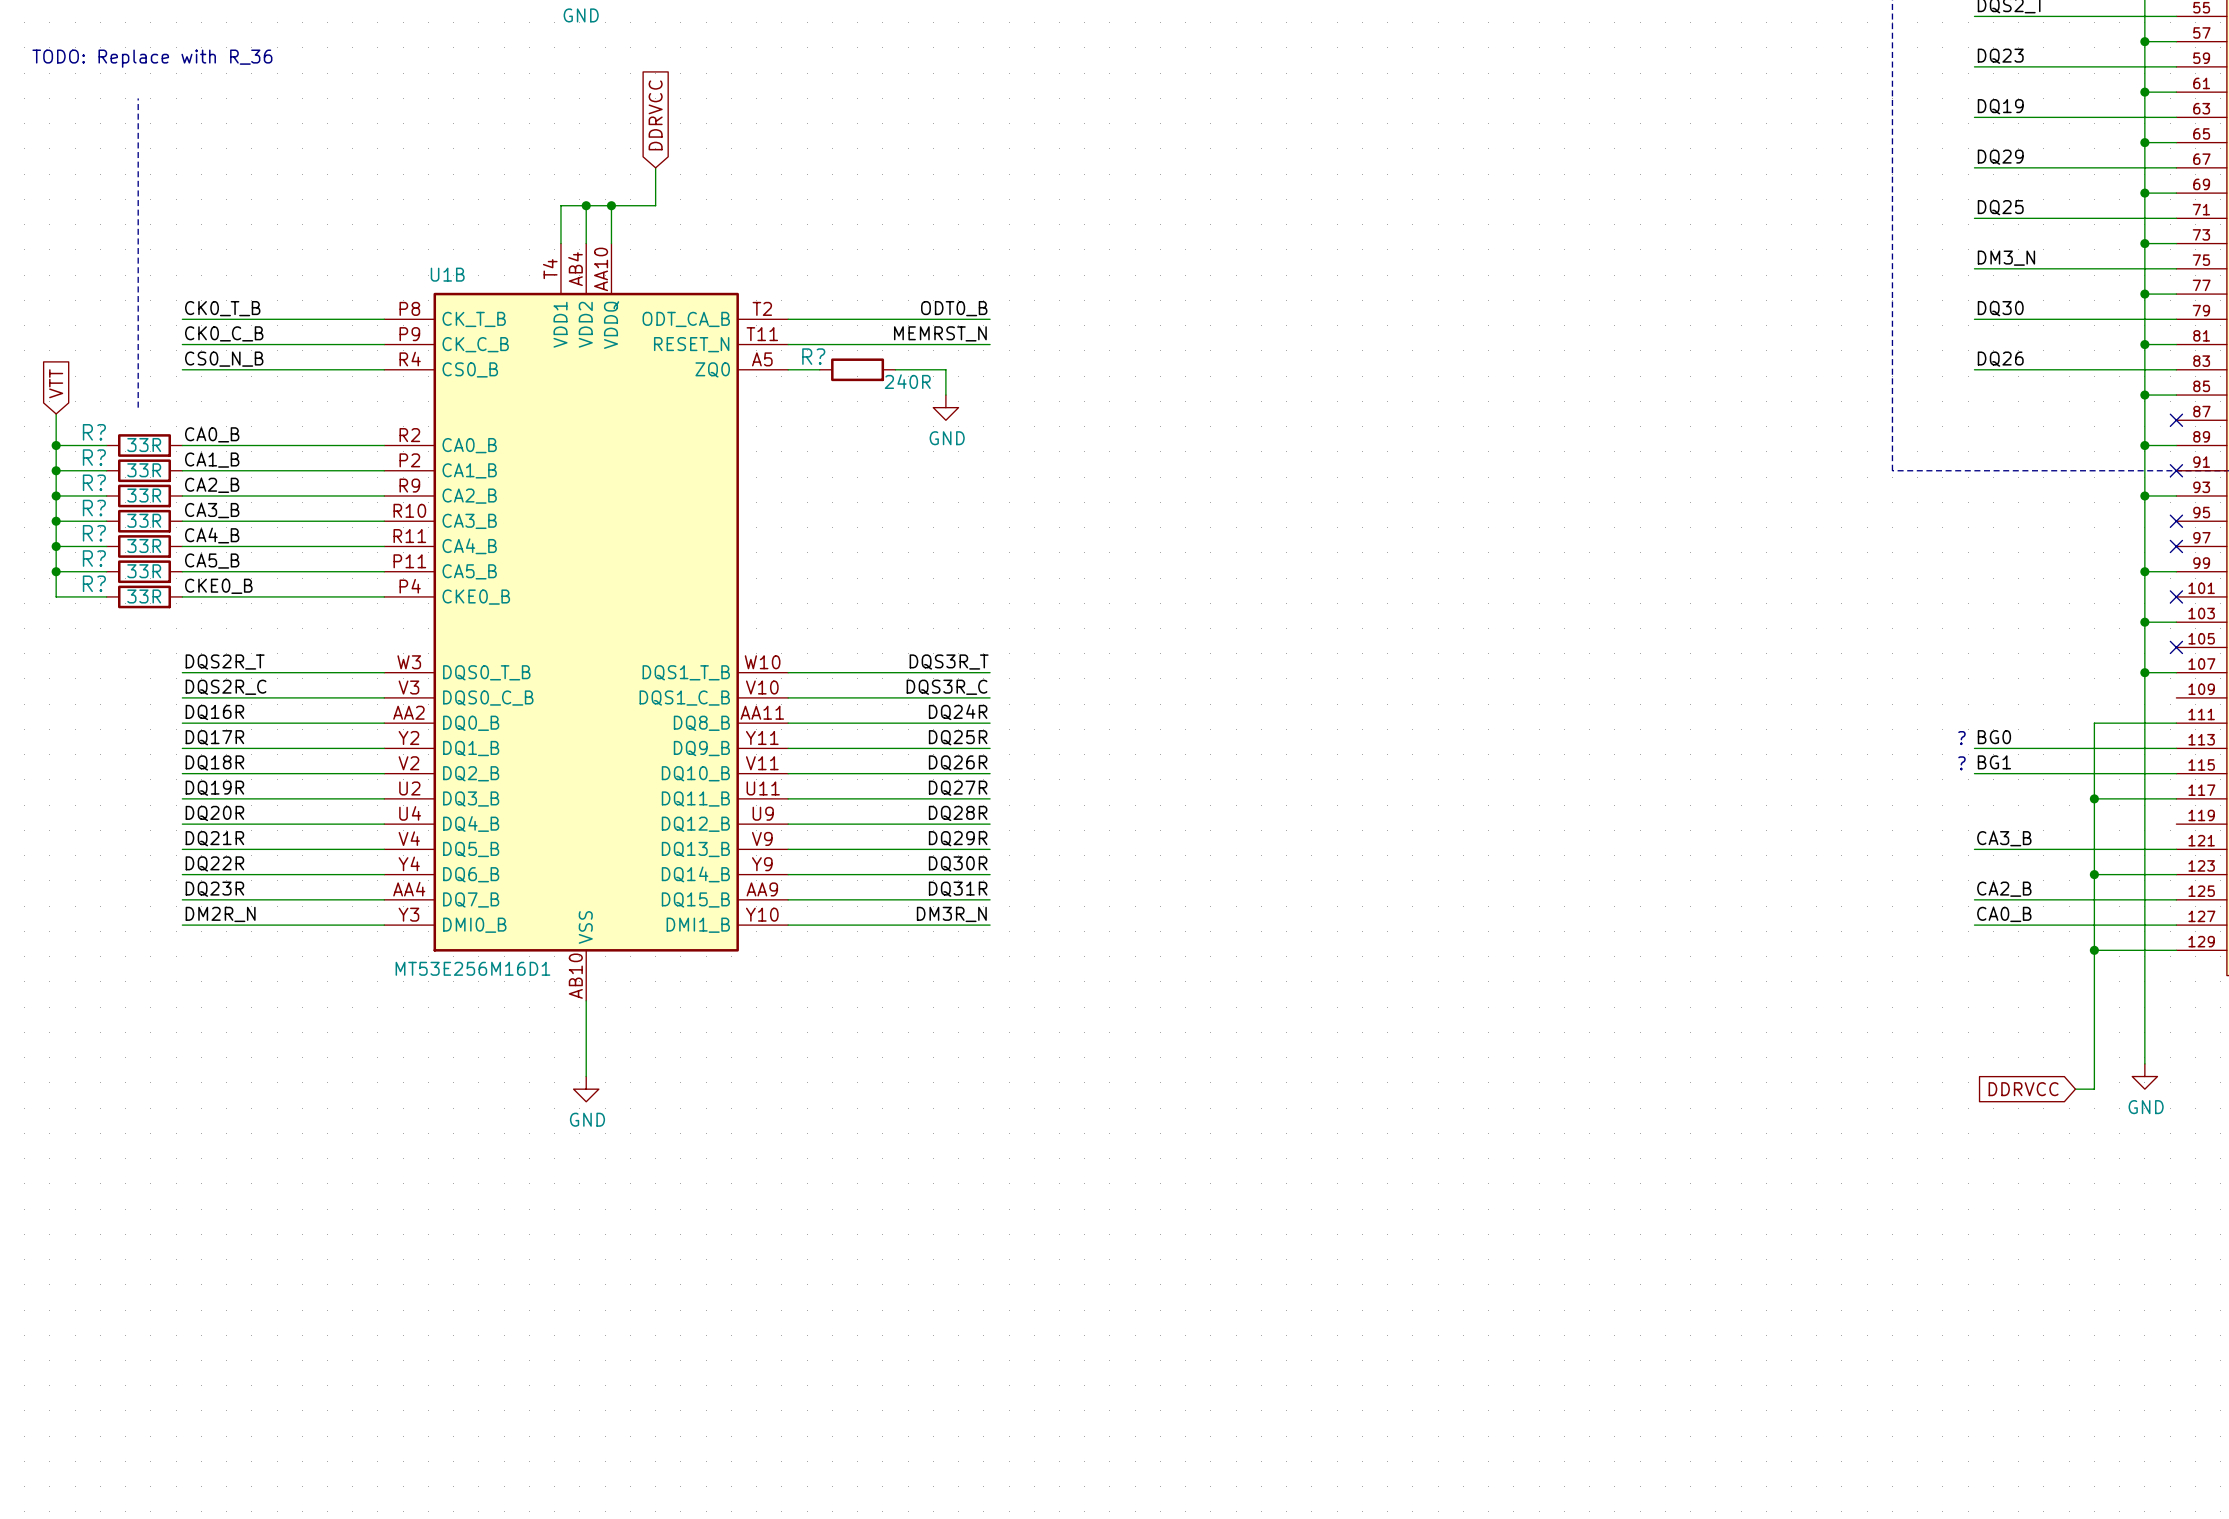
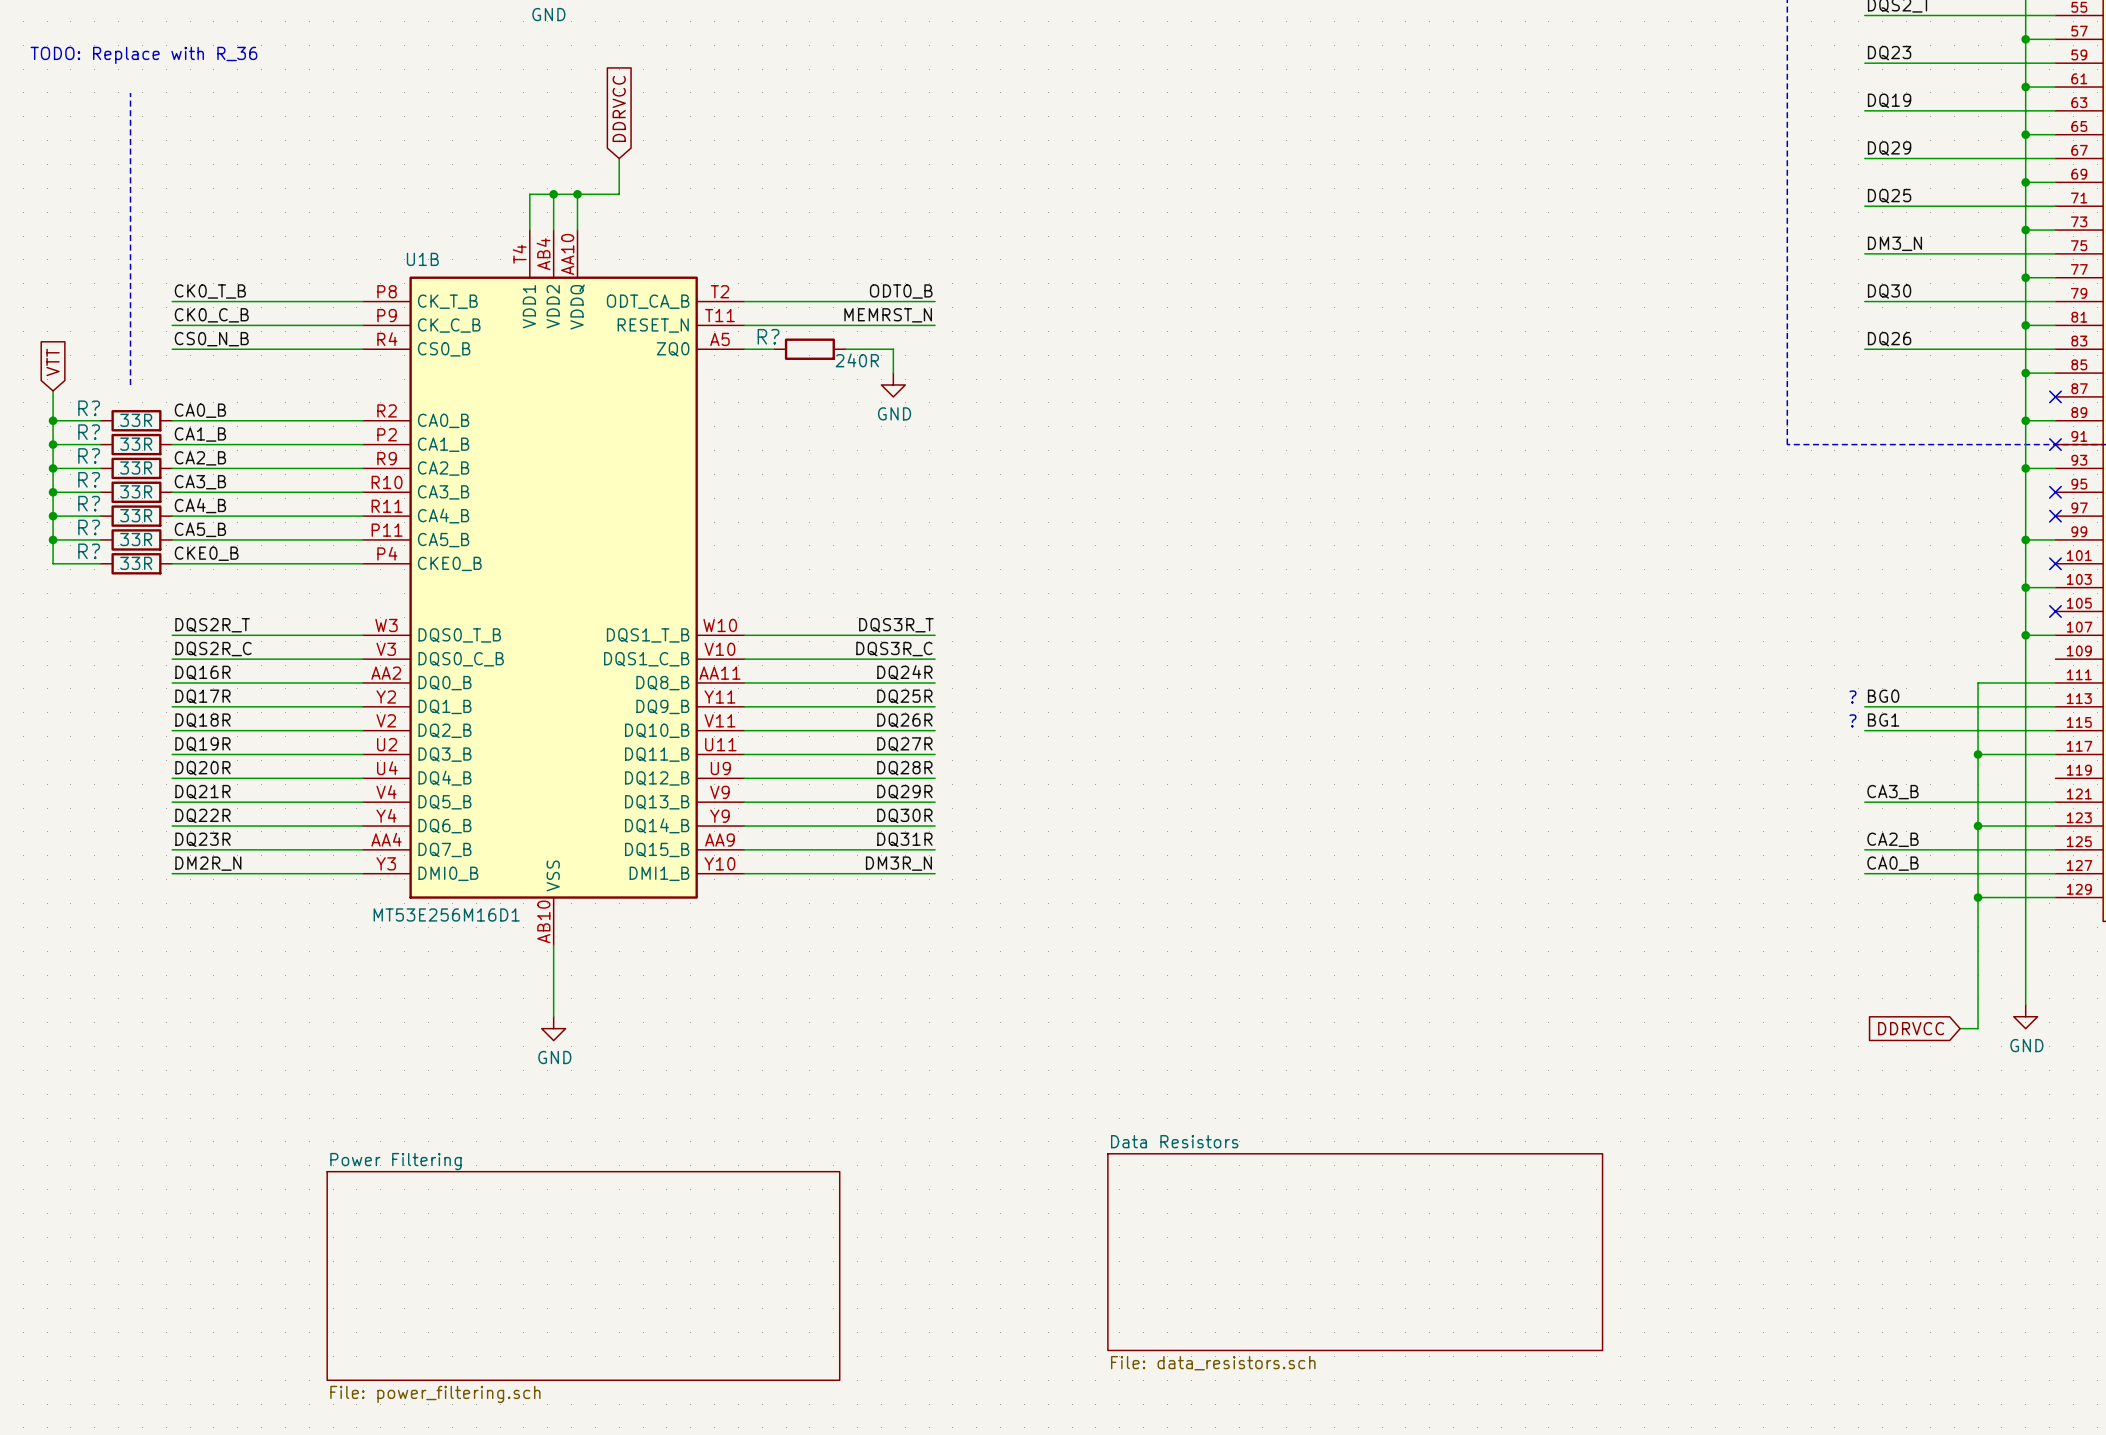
sheet Data Resistors: none -> File: data_resistors.sch (1355, 1252)
sheet Power Filtering: none -> File: power_filtering.sch (583, 1275)

